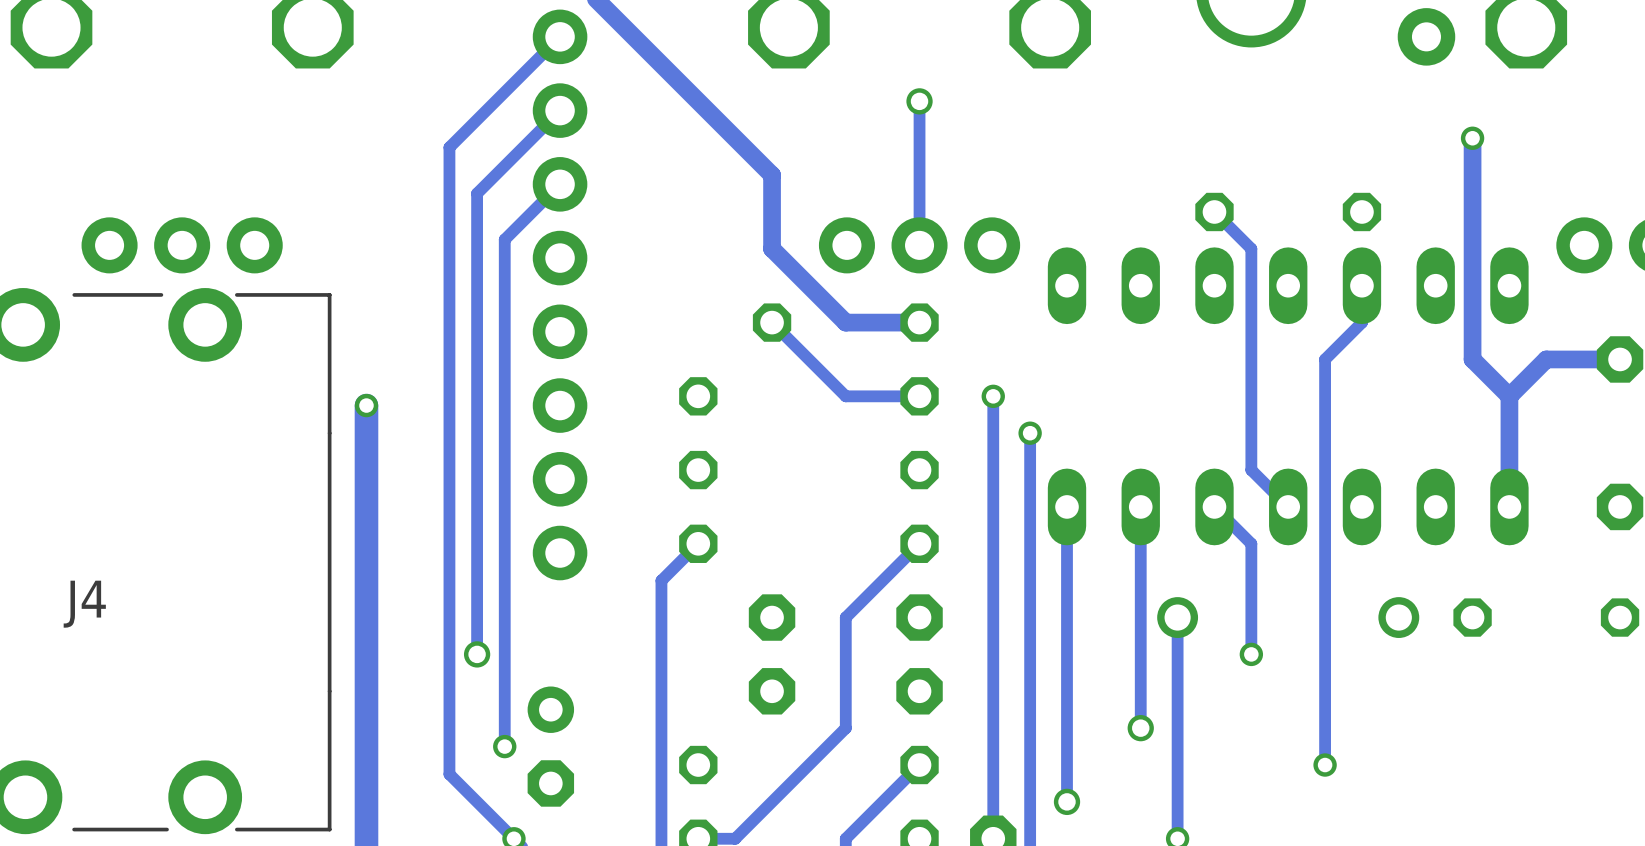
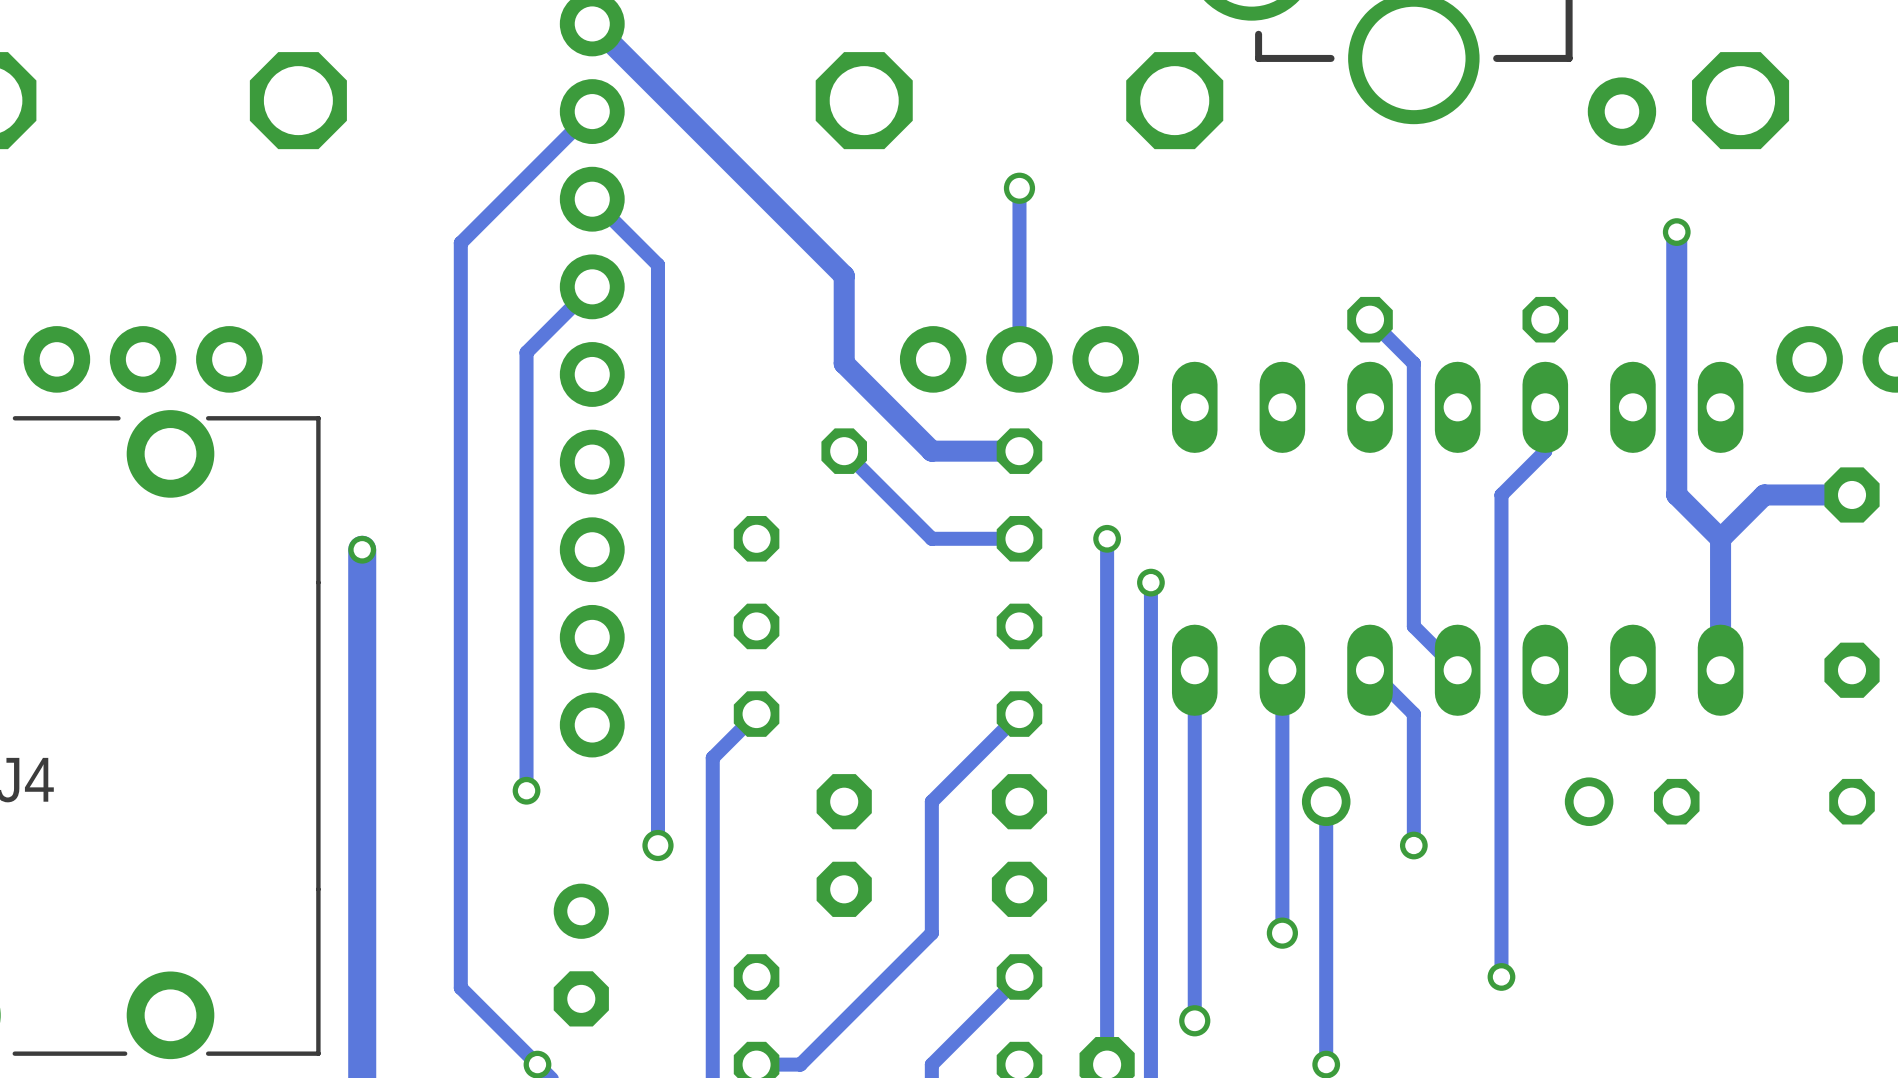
track: (560, 110) (477, 193) (477, 654) -> (592, 199) (657, 264) (657, 845)
track: (504, 608) (504, 746) -> none
via position: (477, 654) -> (657, 845)
via position: (504, 746) -> (526, 790)

